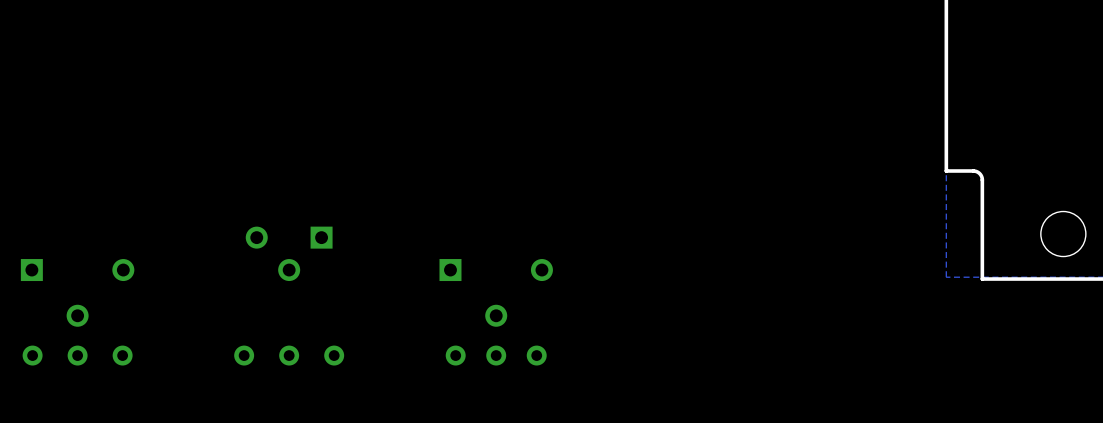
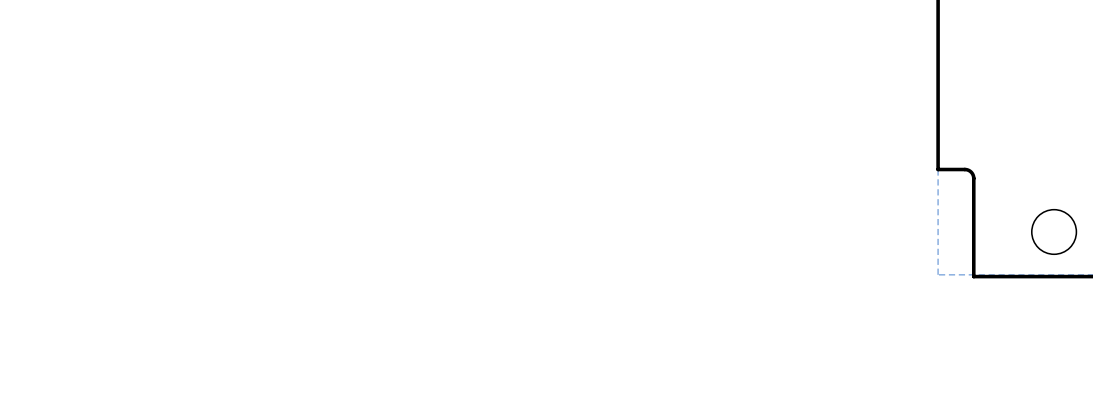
part: (289, 253) -> none
part: (77, 292) -> none
part: (496, 292) -> none
part: (32, 355) -> none
part: (77, 355) -> none
part: (122, 355) -> none
part: (244, 355) -> none
part: (289, 355) -> none
part: (334, 355) -> none
part: (455, 355) -> none
part: (496, 355) -> none
part: (536, 355) -> none

